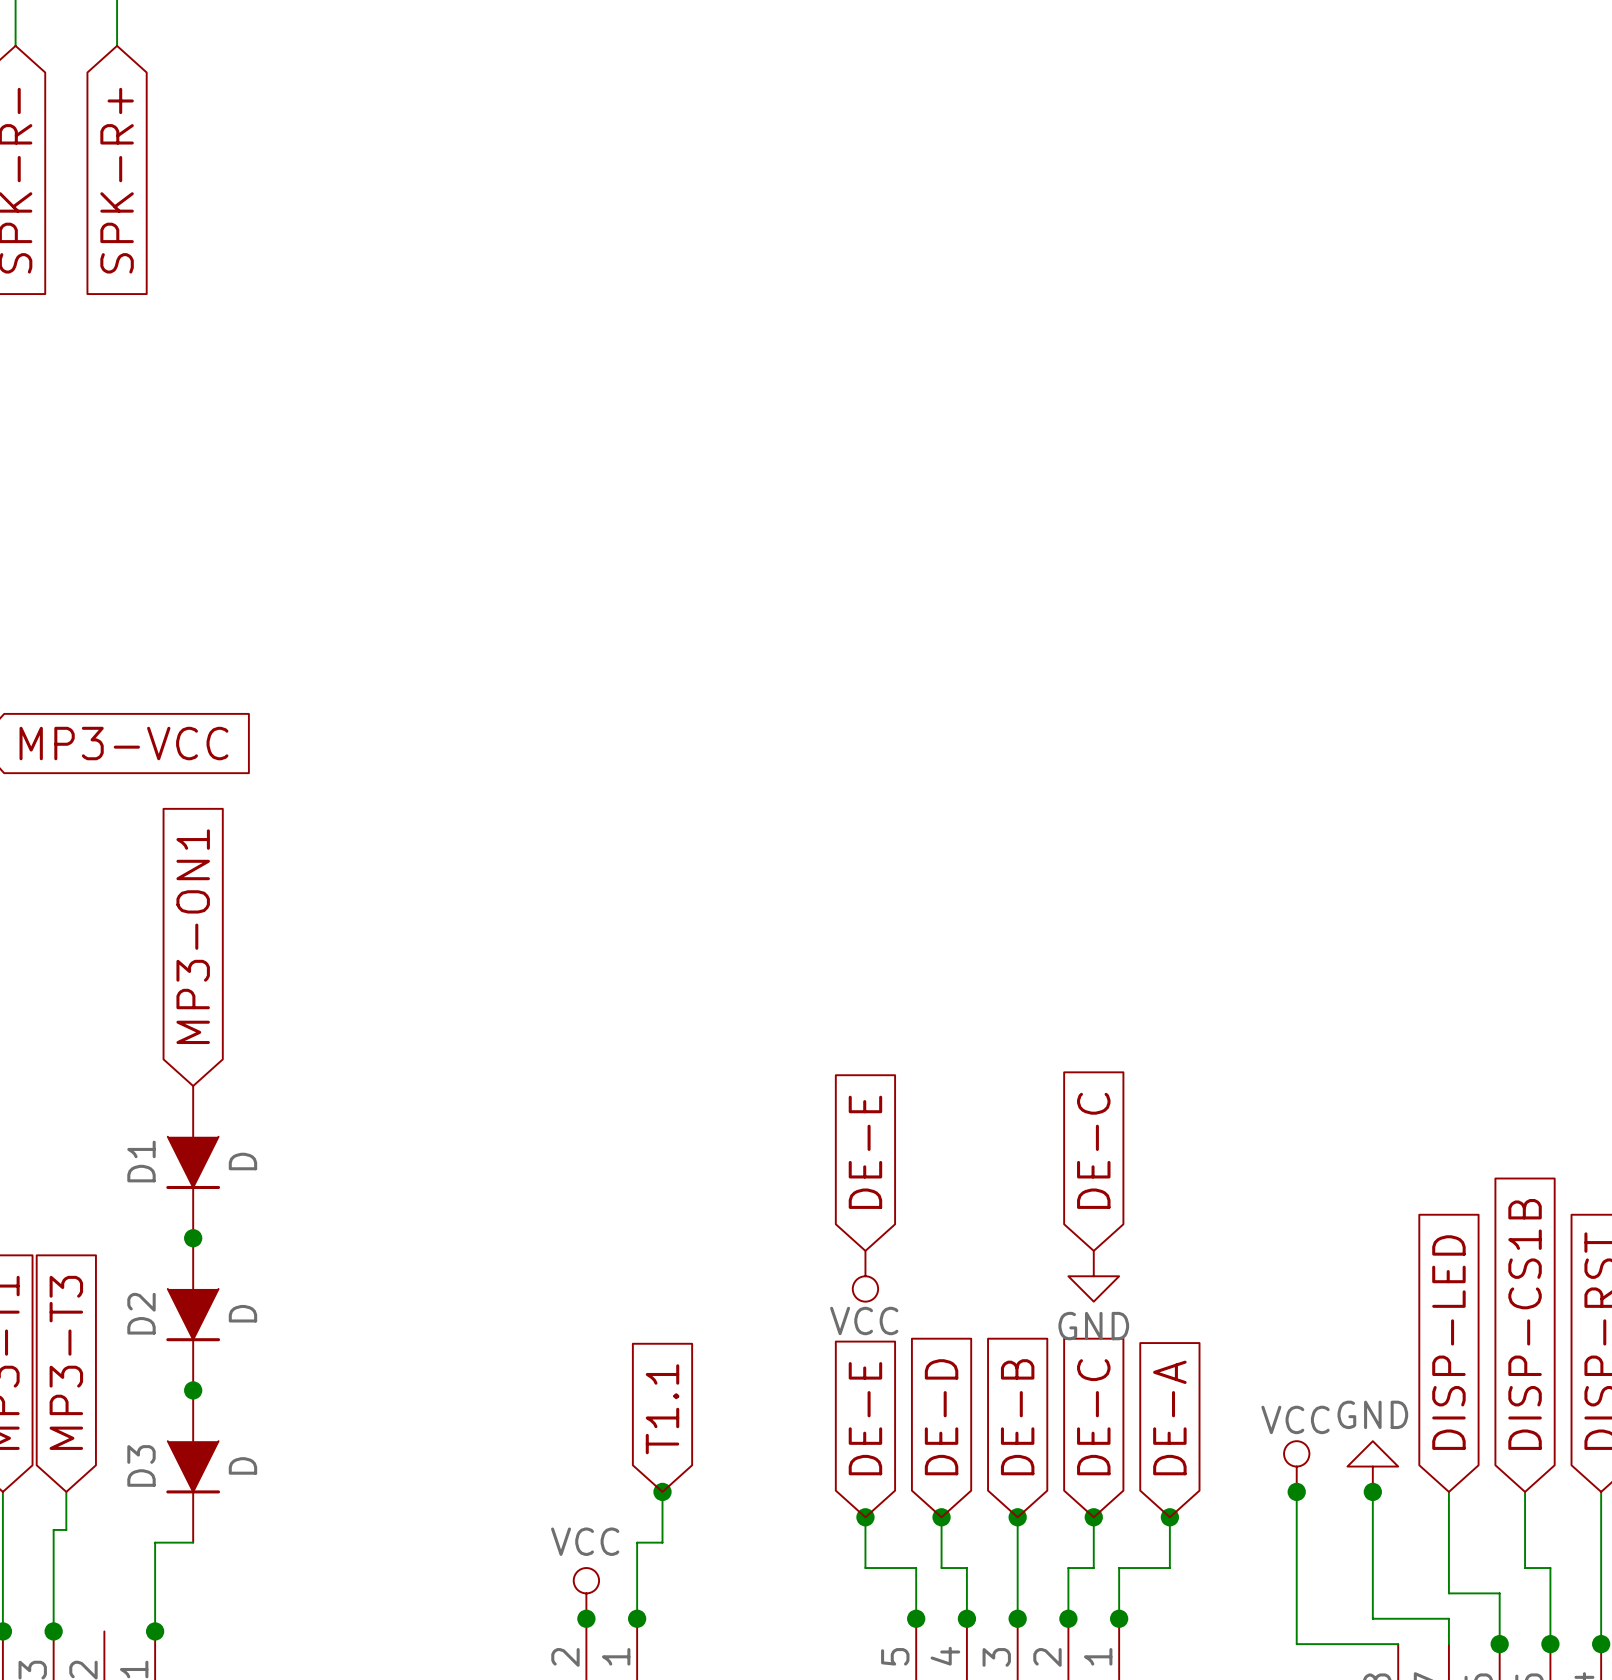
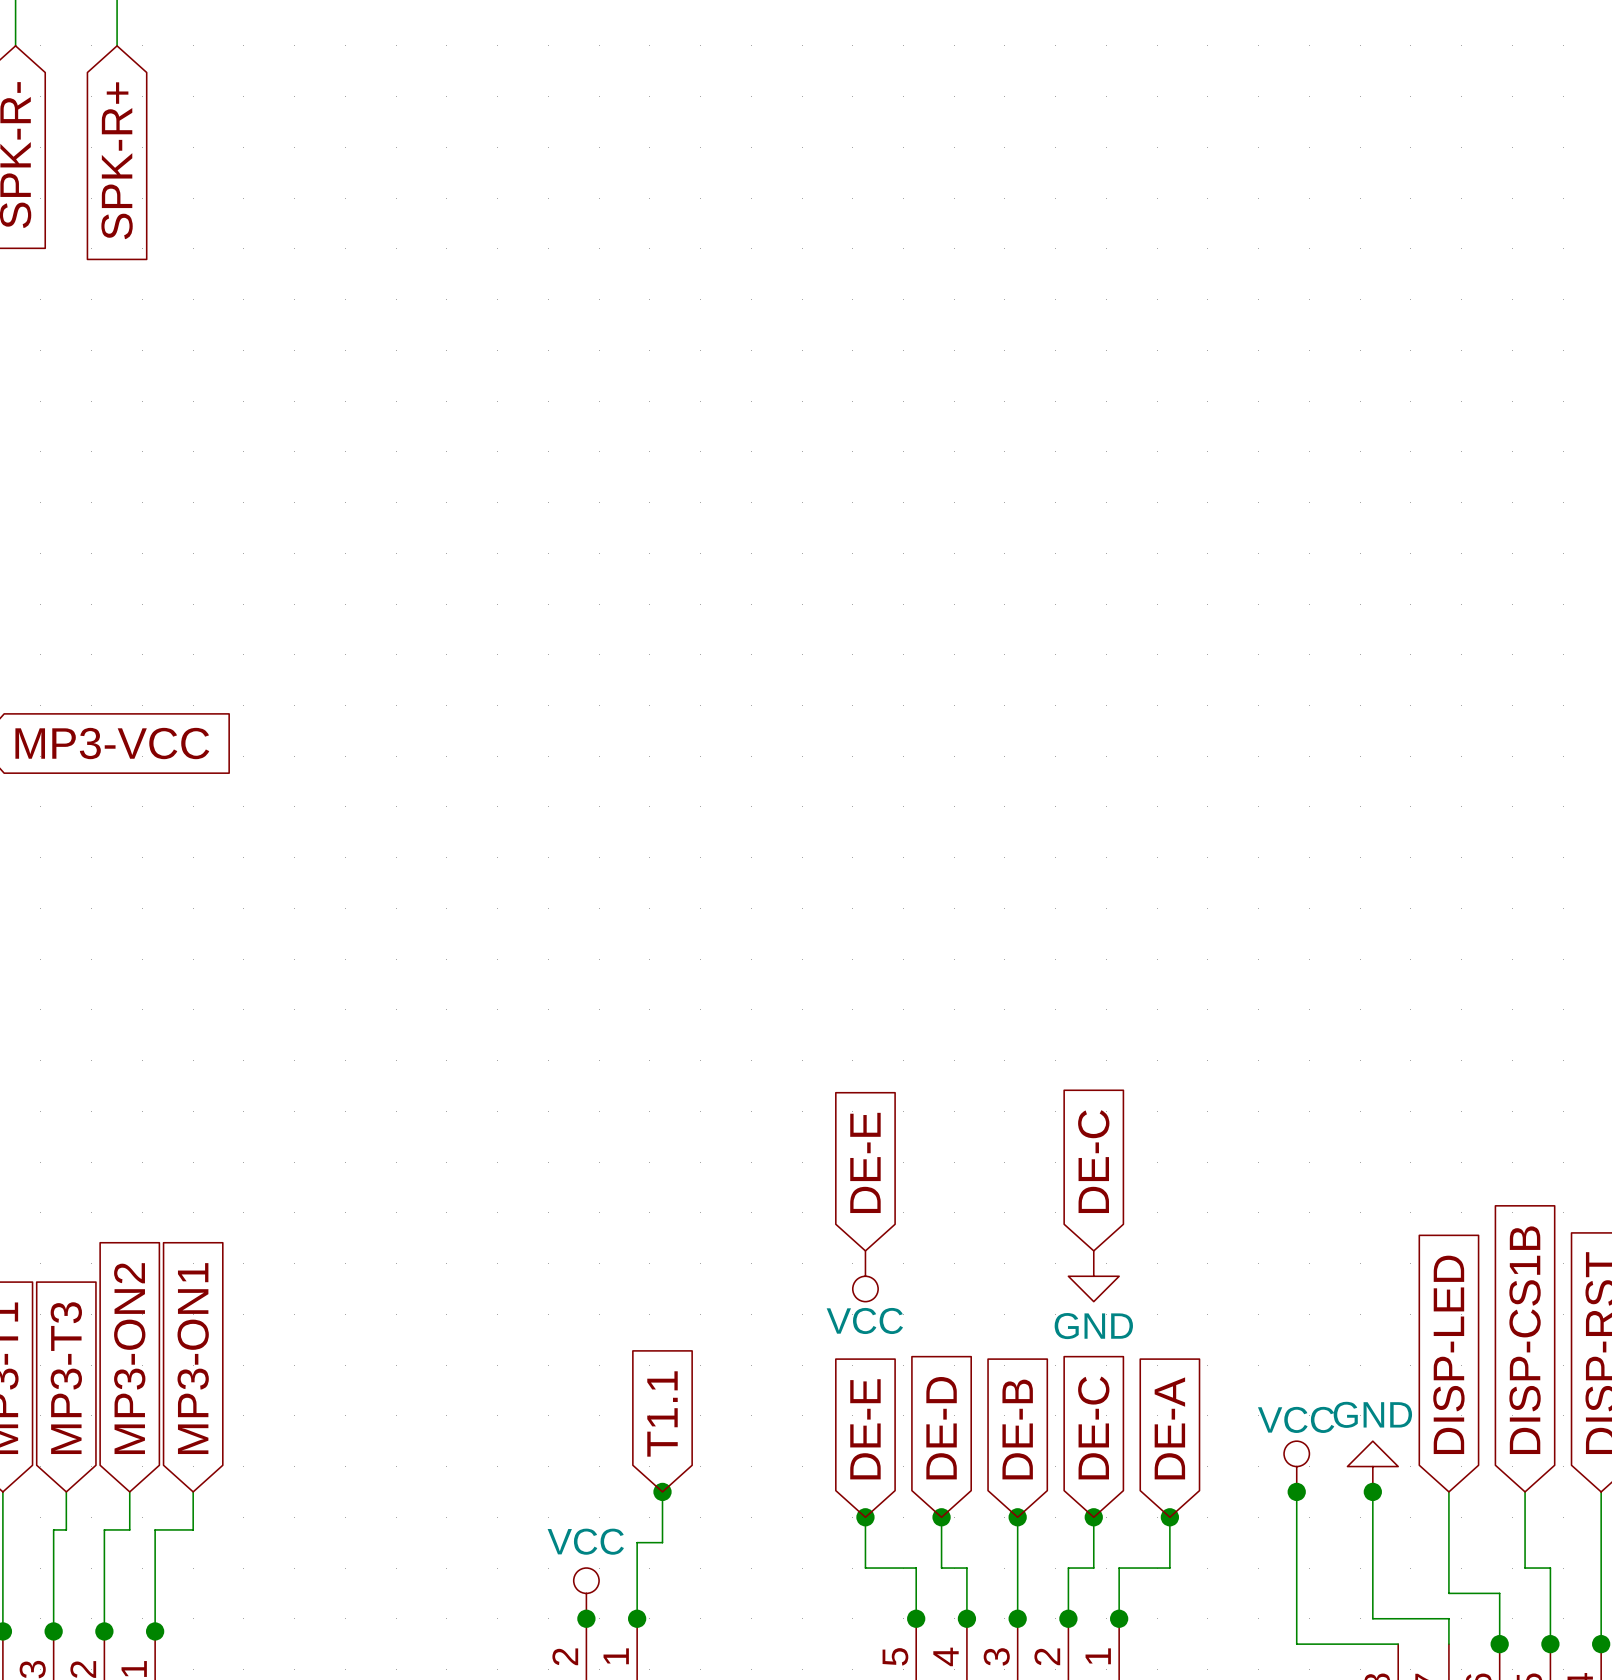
global label position: MP3-ON1 (193, 936) -> MP3-ON1 (193, 1358)
D1: D (193, 1162) -> none
junction: (193, 1238) -> none
D2: D (193, 1314) -> none
global label: none -> MP3-ON2 (129, 1358)
junction: (193, 1390) -> none
D3: D (193, 1466) -> none
wire: none -> (129, 1491) (129, 1529) (104, 1529) (104, 1631)
wire: (155, 1542) (193, 1542) -> (155, 1542) (155, 1529) (193, 1529) (193, 1491)
junction: none -> (104, 1631)

